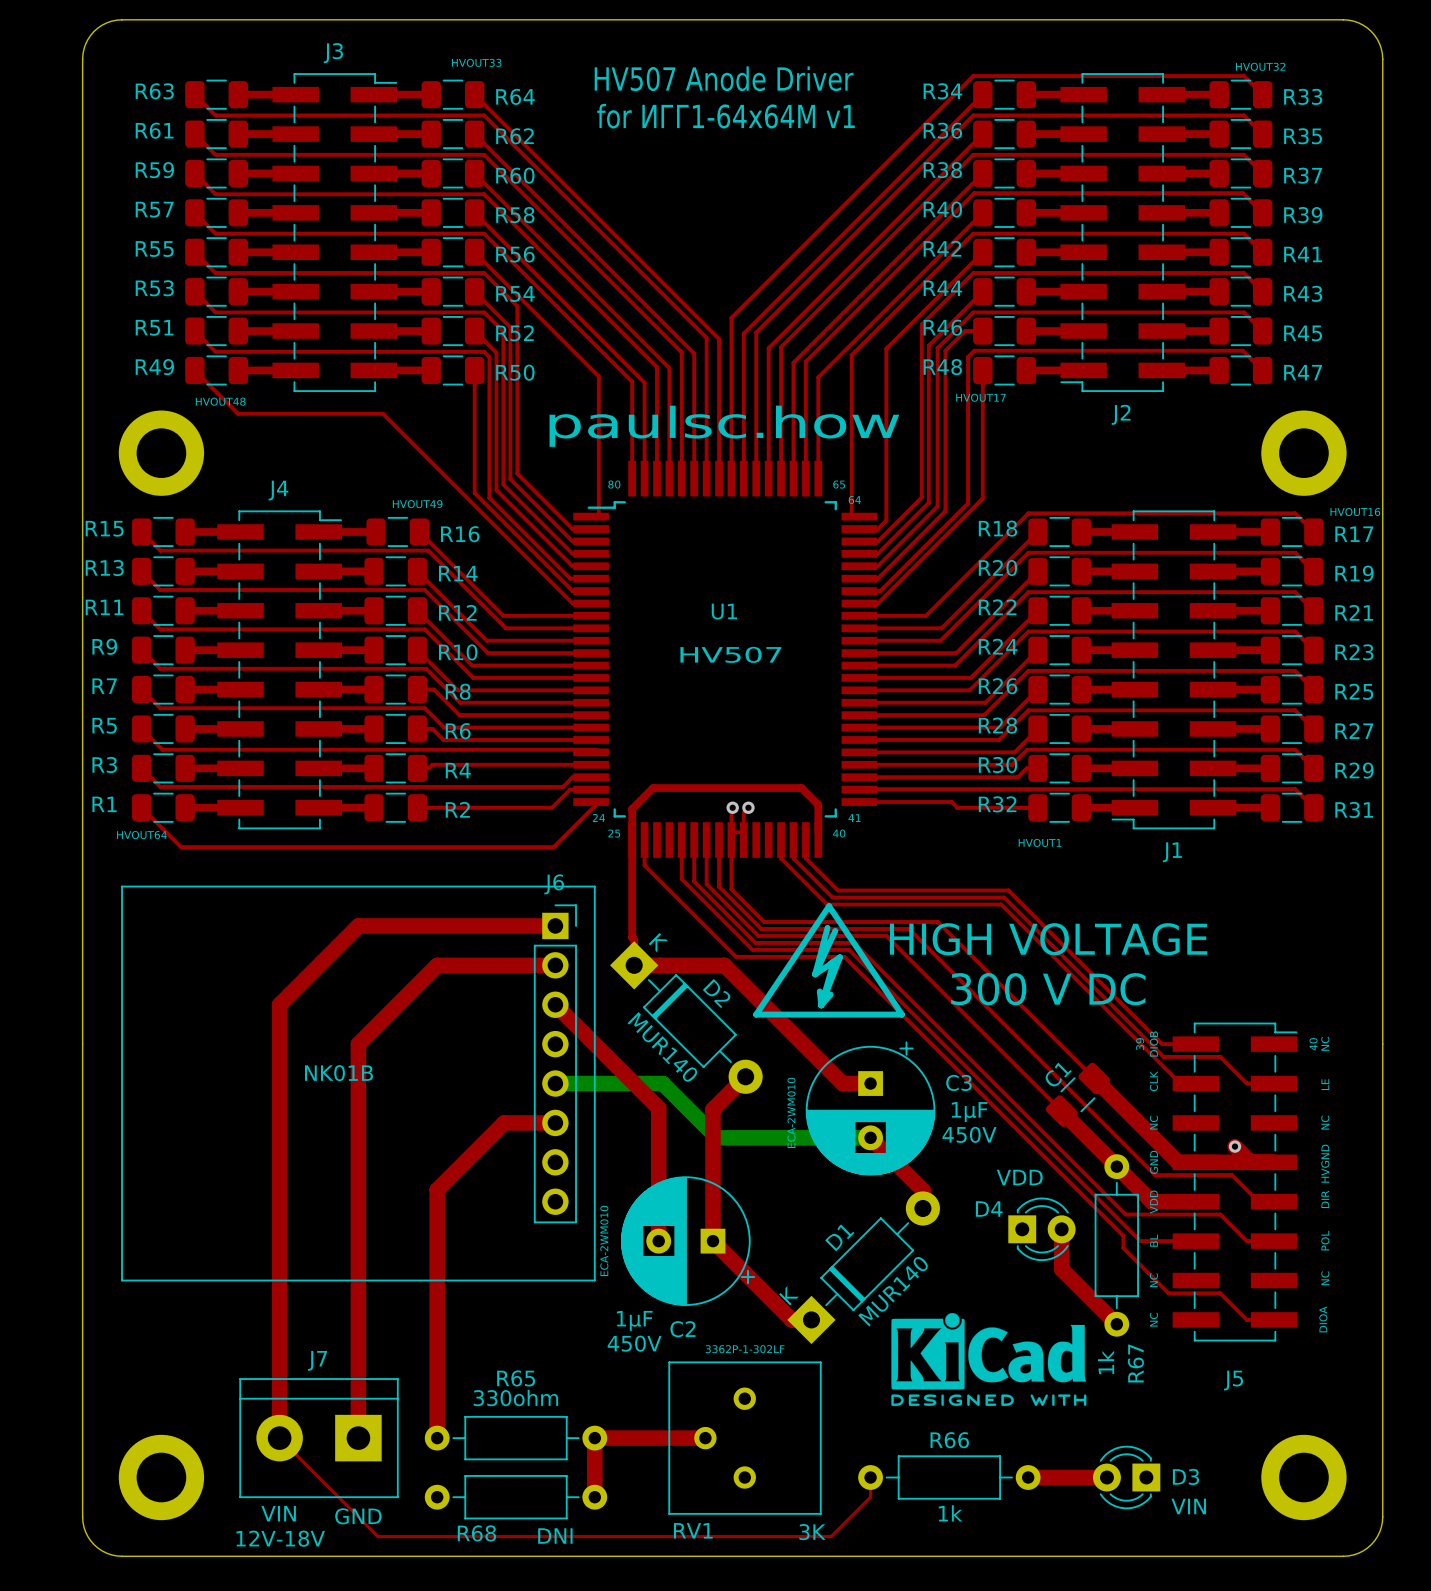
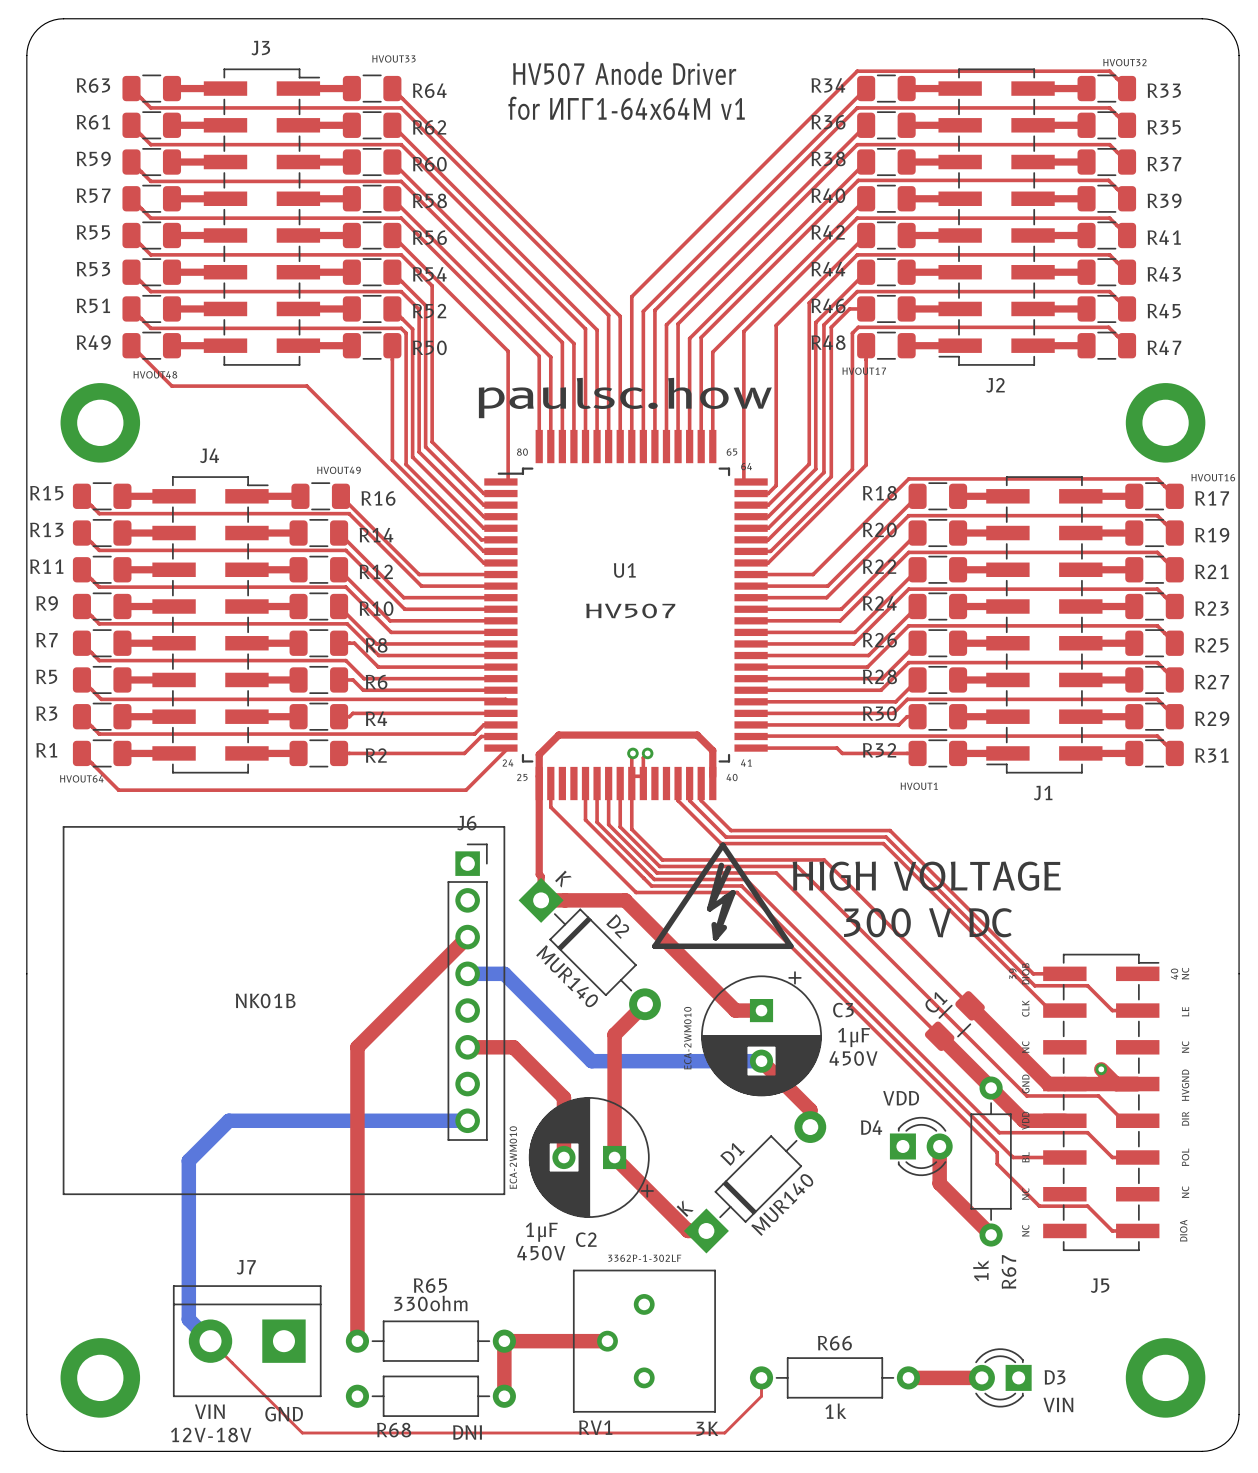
top track: (555, 925) (358, 925) (279, 1004) (279, 1438) -> none
top track: (555, 965) (437, 965) (358, 1044) (358, 1438) -> none
top track: (555, 1004) (658, 1108) (658, 1176) -> (467, 1047) (513, 1047) (563, 1097)
bottom track: (555, 1083) (662, 1083) (717, 1137) -> (467, 973) (504, 973) (591, 1061) (618, 1061)
top track: (555, 1122) (504, 1122) (437, 1189) -> (467, 937) (357, 1047) (357, 1109)
bottom track: none -> (467, 1120) (228, 1120) (188, 1160) (188, 1319) (210, 1341)
drawing: [891, 1313, 1087, 1406] -> none

